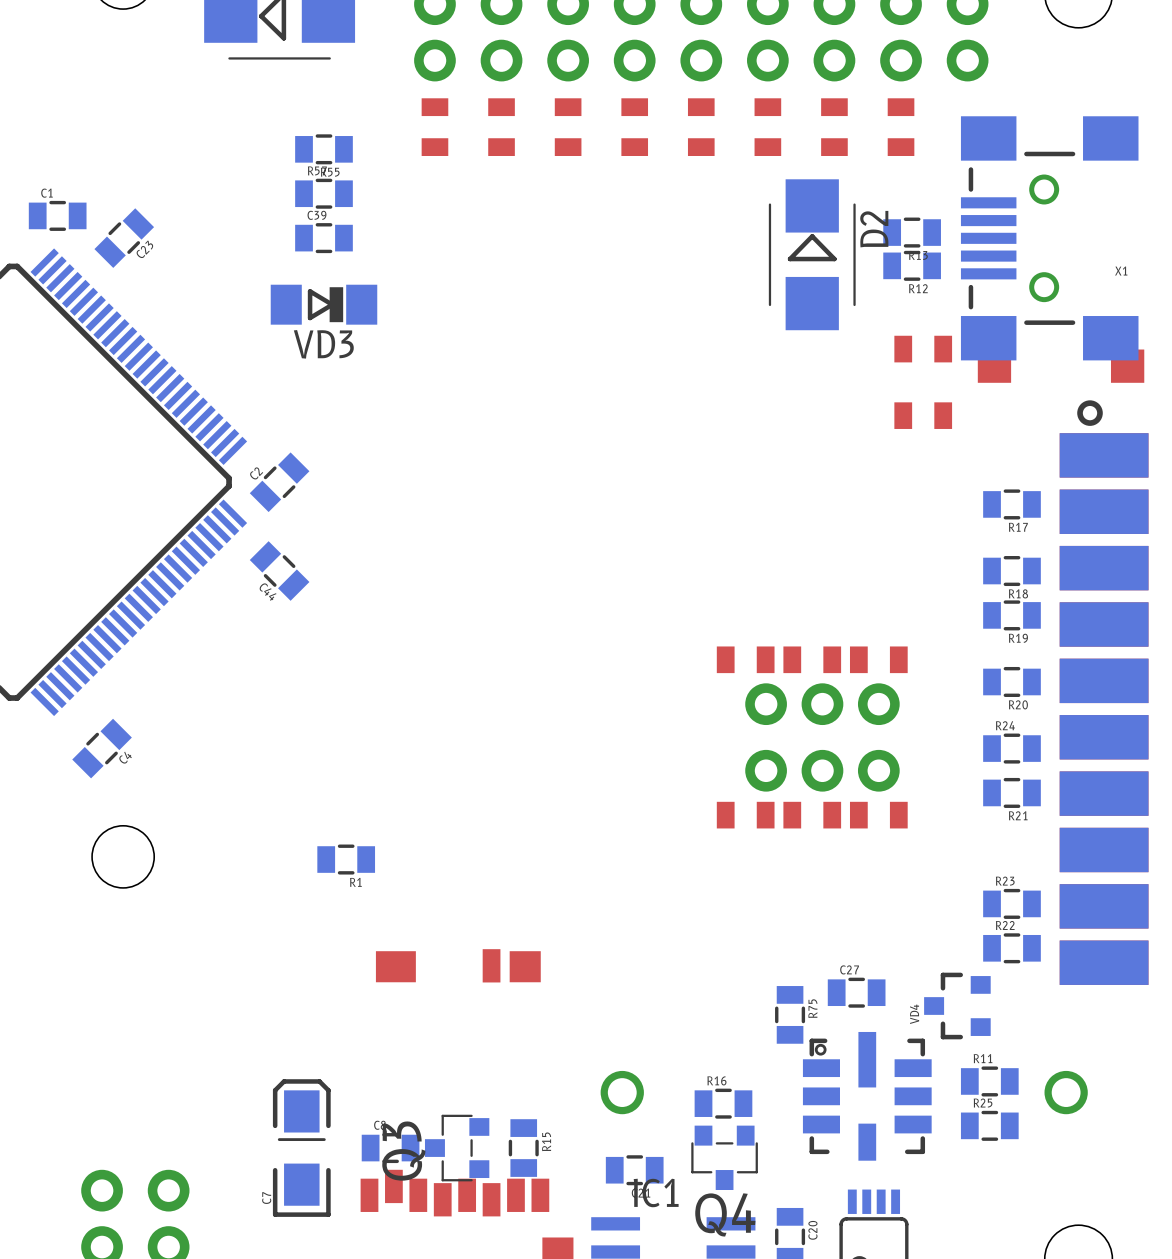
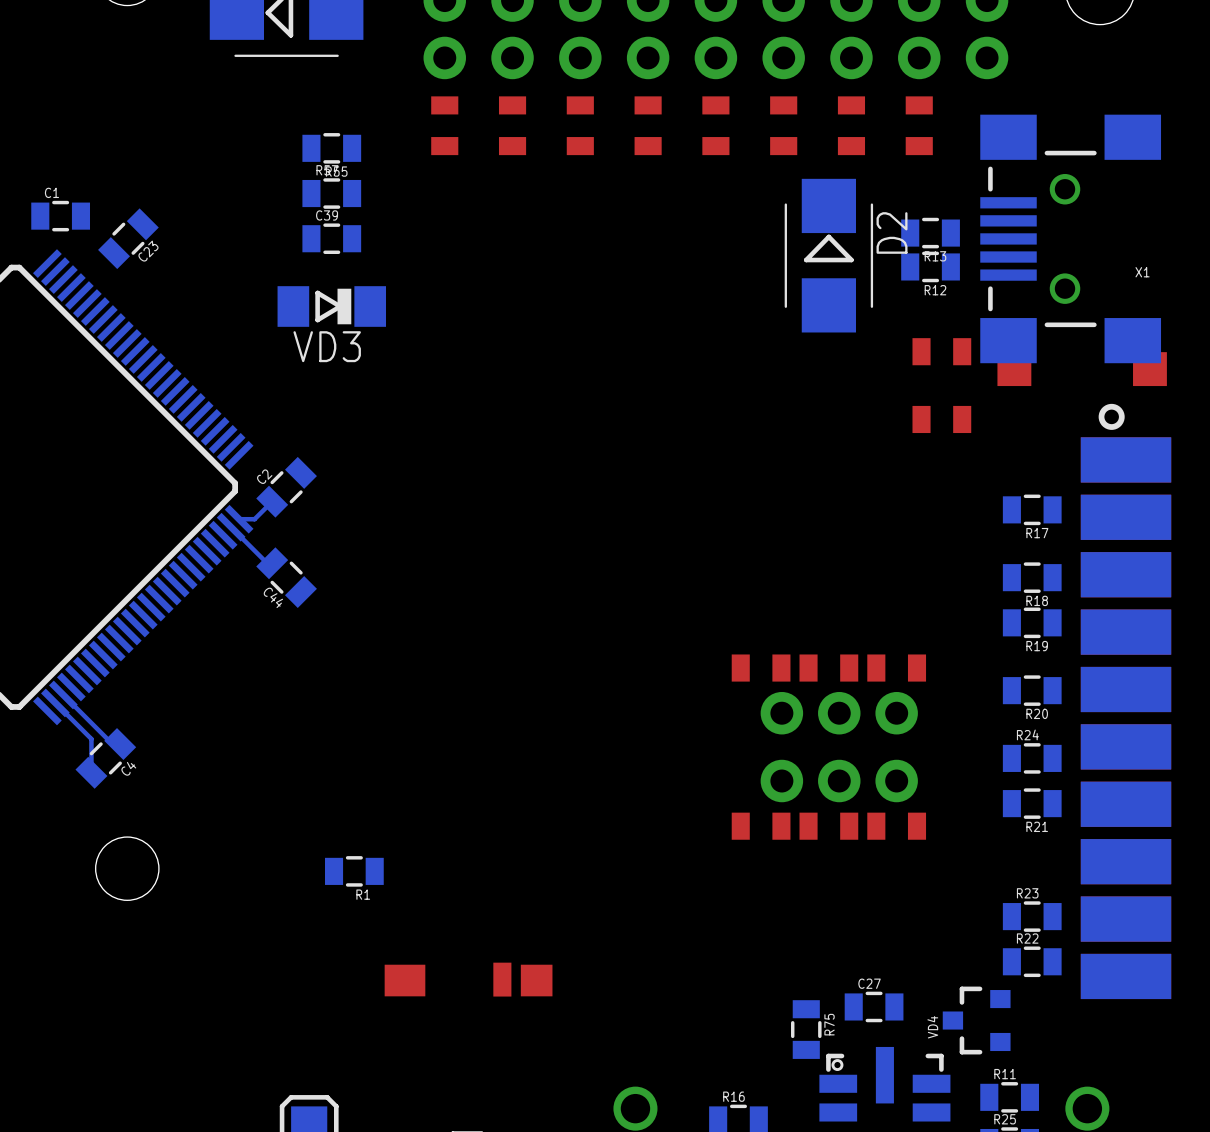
bottom track: none -> (272, 501) (254, 519) (239, 519)
bottom track: none -> (231, 527) (267, 563) (272, 563)
bottom track: none -> (63, 694) (112, 744) (120, 744)
bottom track: none -> (55, 702) (91, 739) (91, 772)

